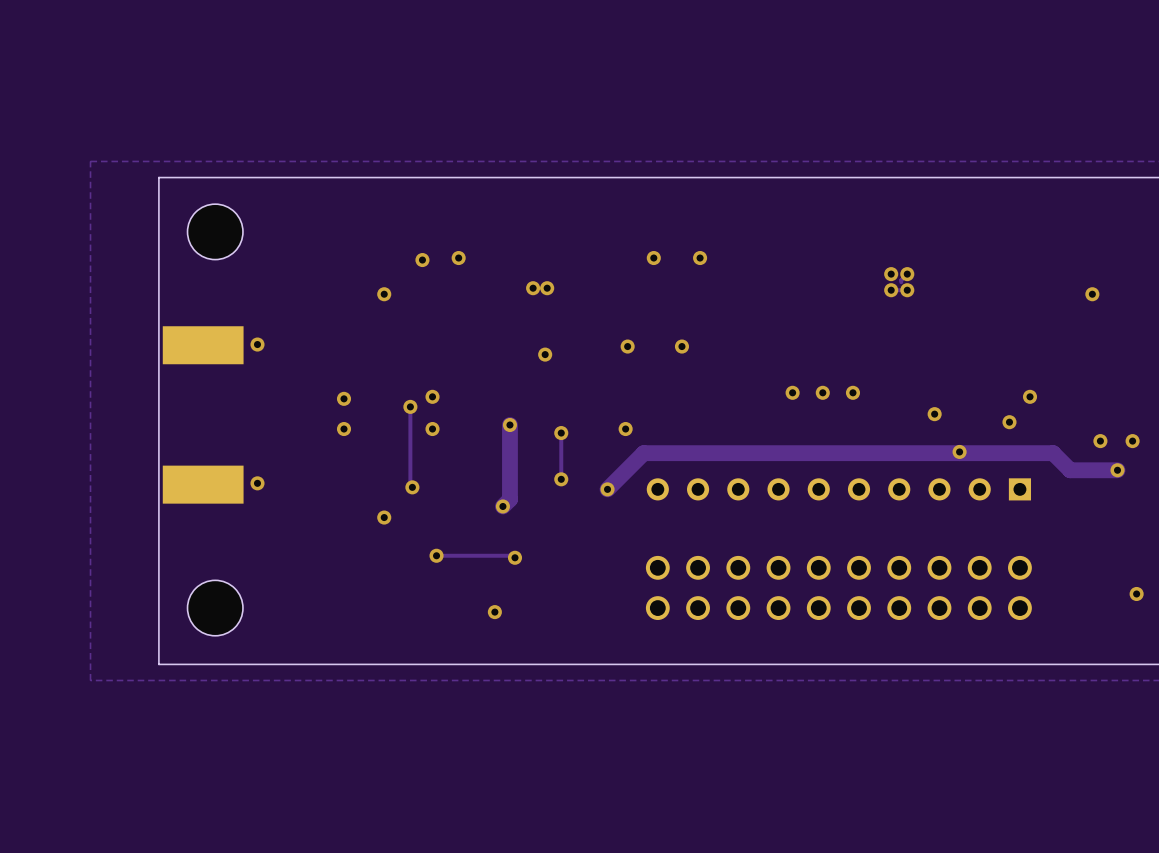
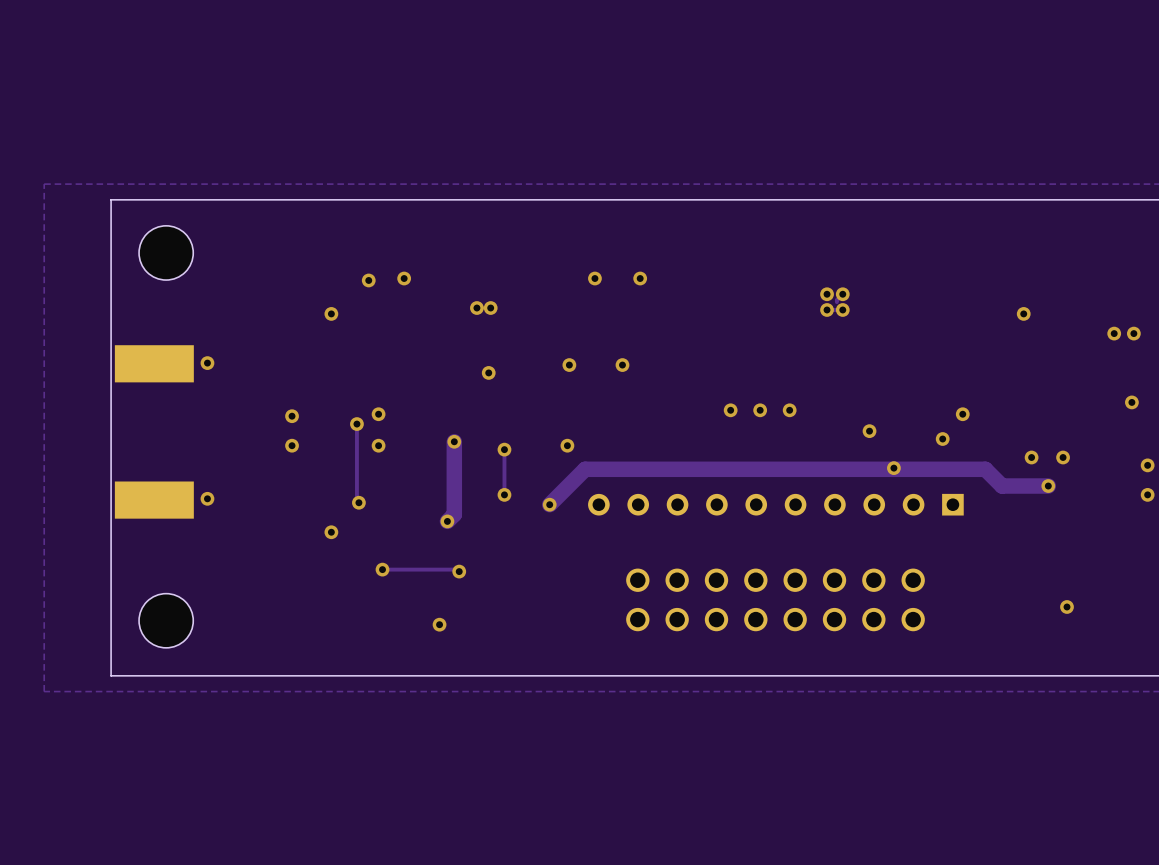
part footprint: [645, 555, 1032, 621] -> [626, 568, 925, 632]

